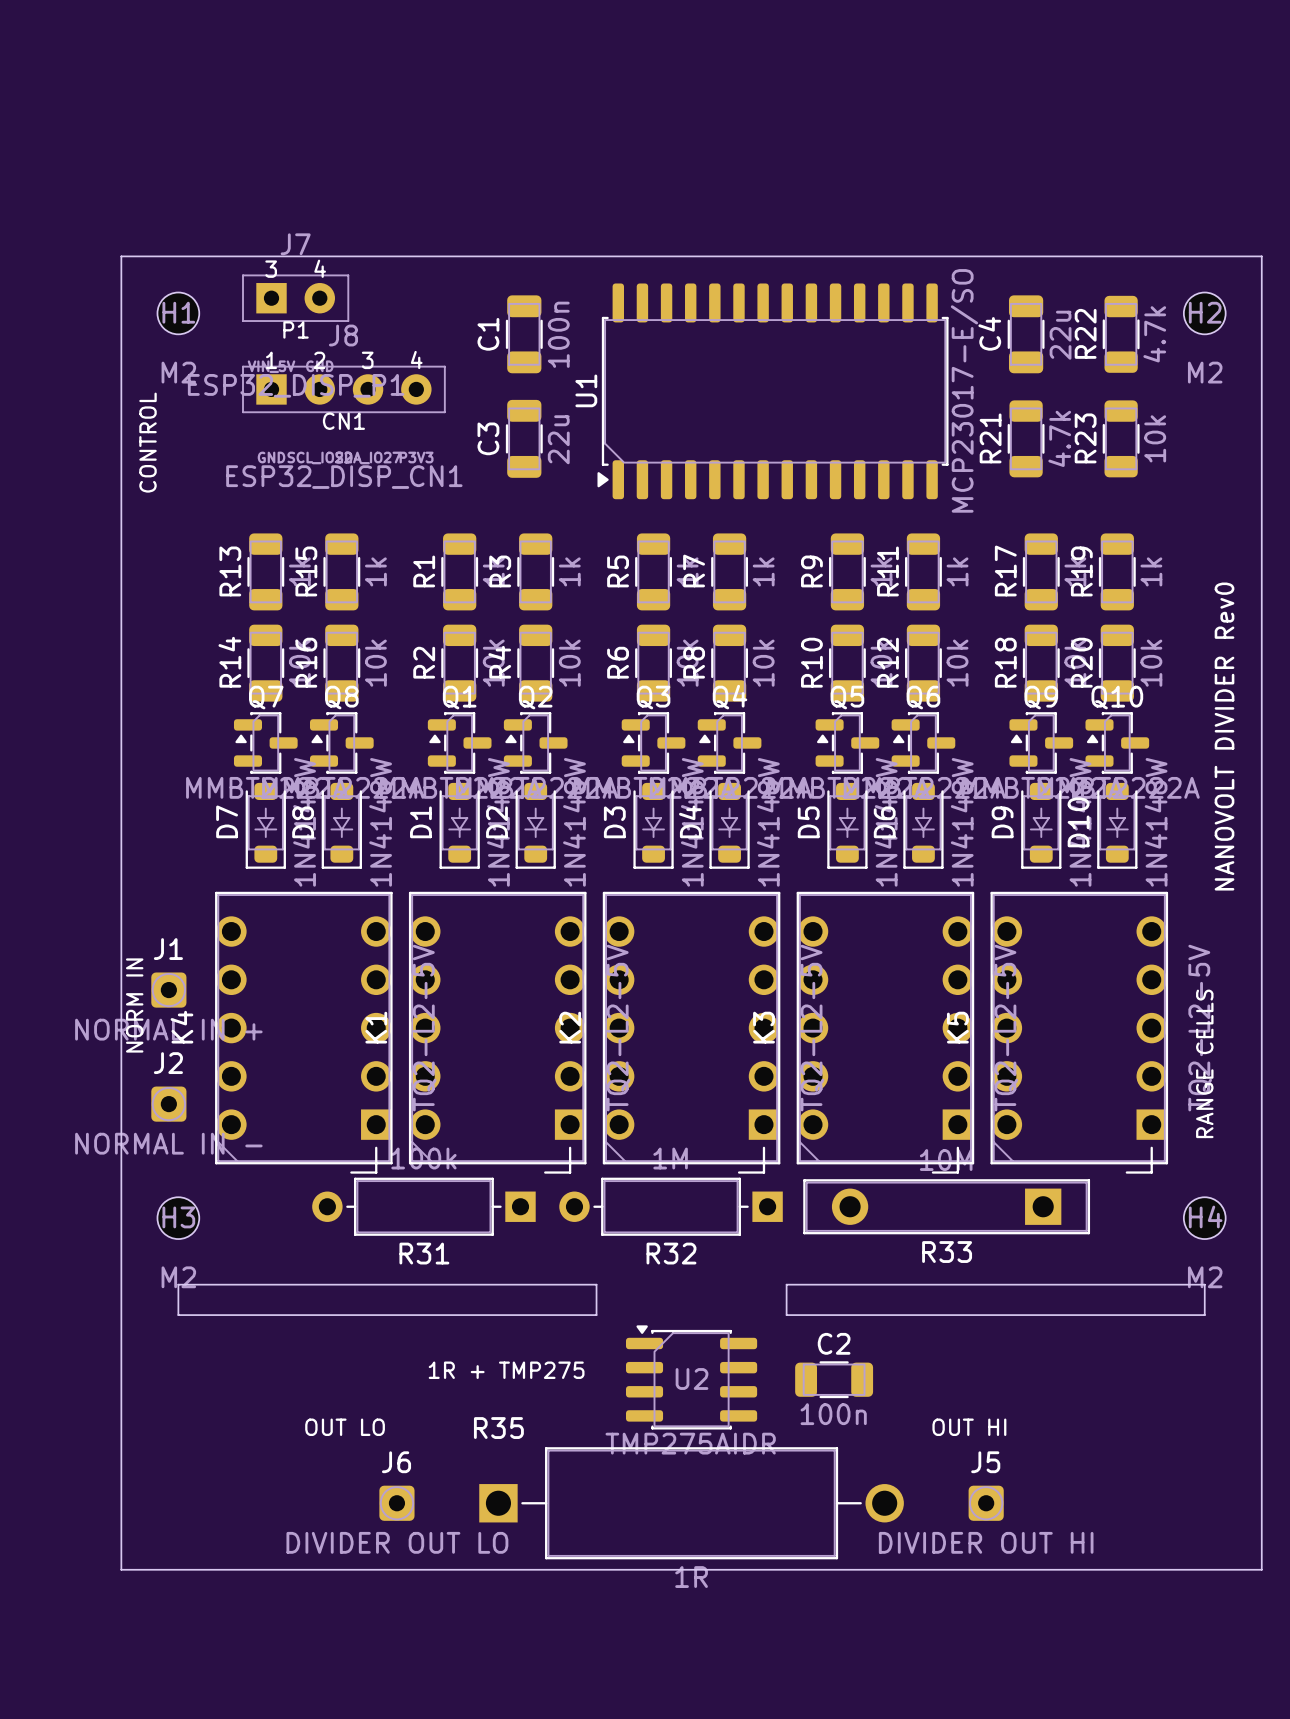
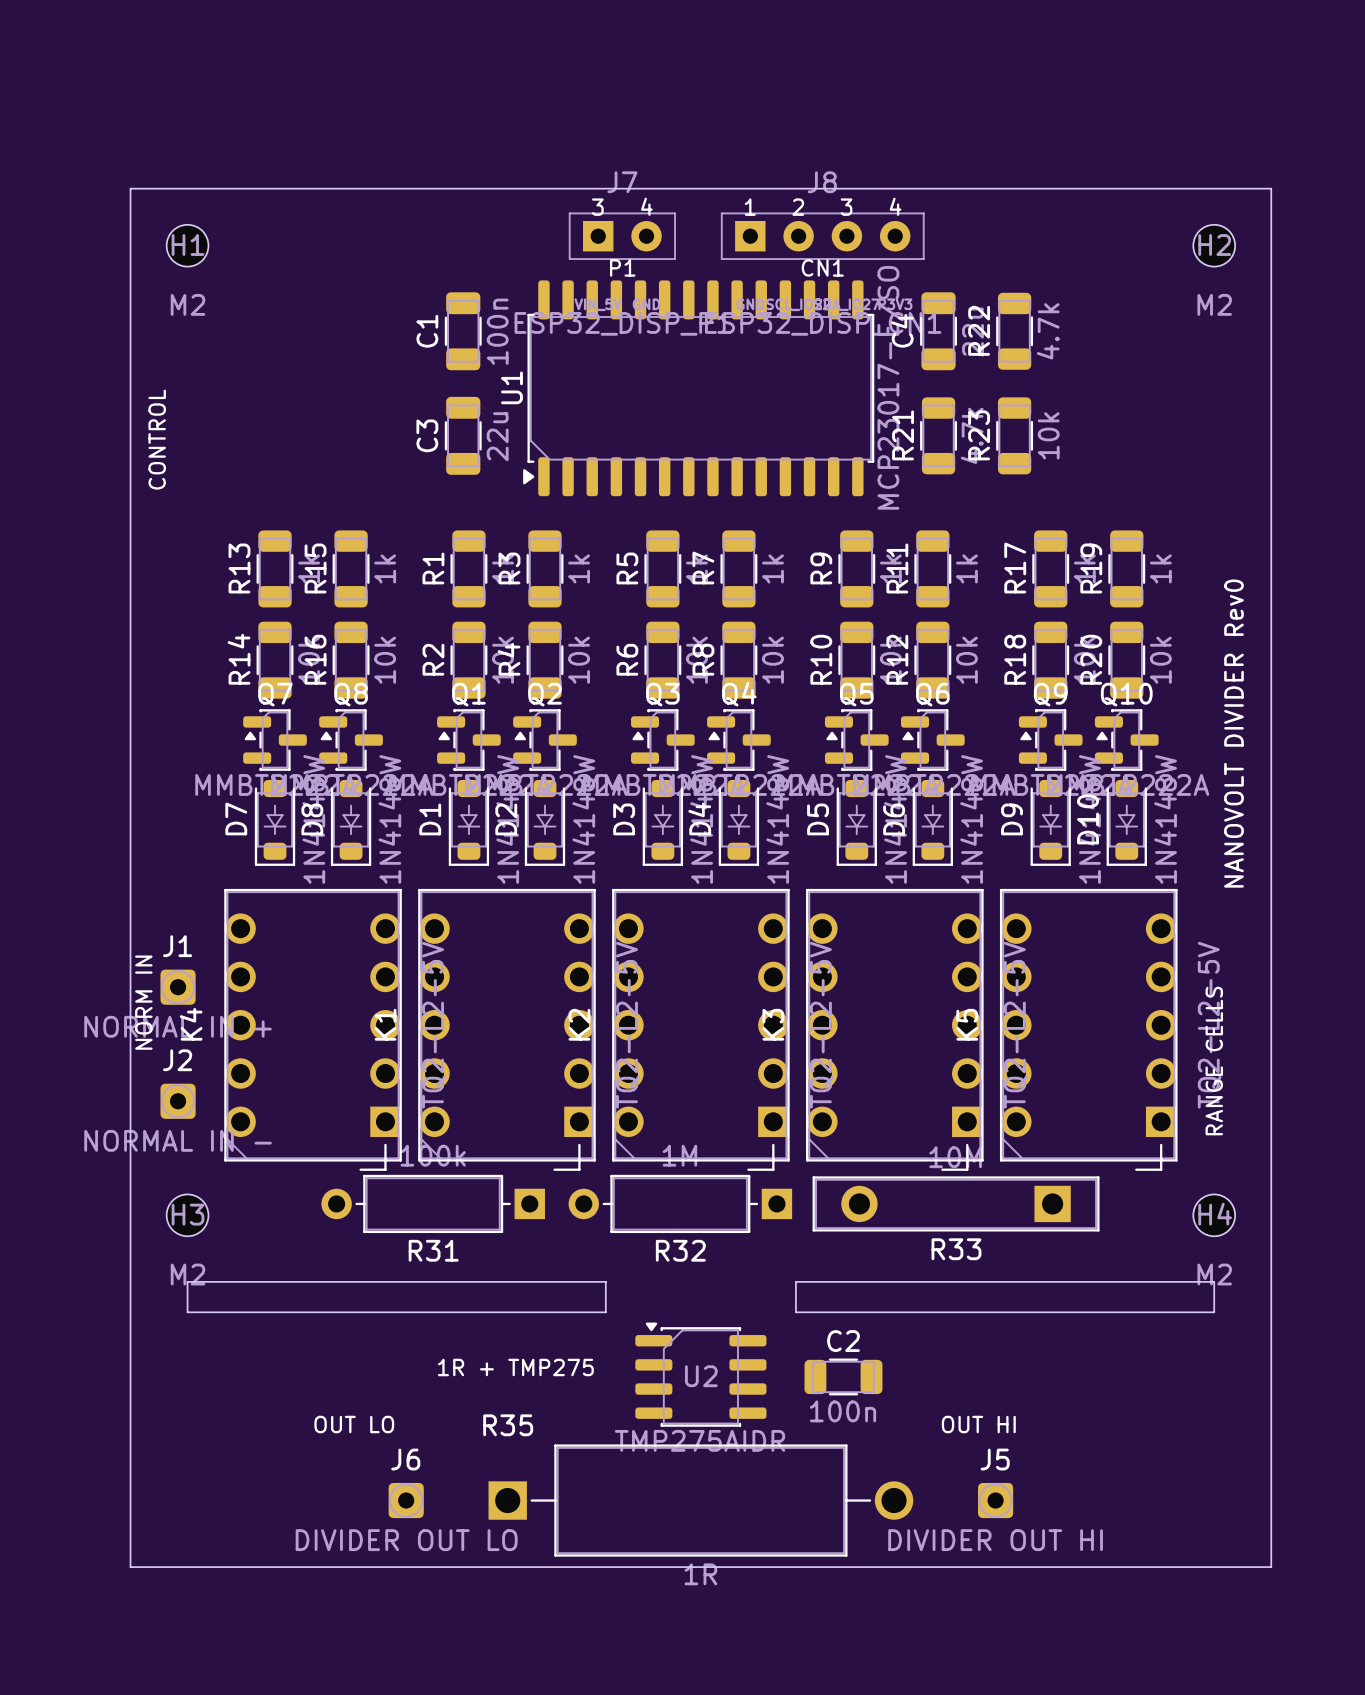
board edge: (121, 256) (1261, 256) -> (130, 253) (130, 188) (1271, 188) (1271, 253)
J7 position: (295, 298) -> (622, 236)
H1 position: (178, 313) -> (187, 245)
H2 position: (1204, 313) -> (1214, 245)
C1 position: (524, 334) -> (463, 331)
C4 position: (1026, 334) -> (938, 331)
R22 position: (1121, 334) -> (1014, 331)
J8 position: (343, 389) -> (822, 236)
U1 position: (773, 391) -> (698, 388)
C3 position: (524, 438) -> (463, 435)
R21 position: (1026, 438) -> (938, 435)
R23 position: (1121, 438) -> (1014, 435)

